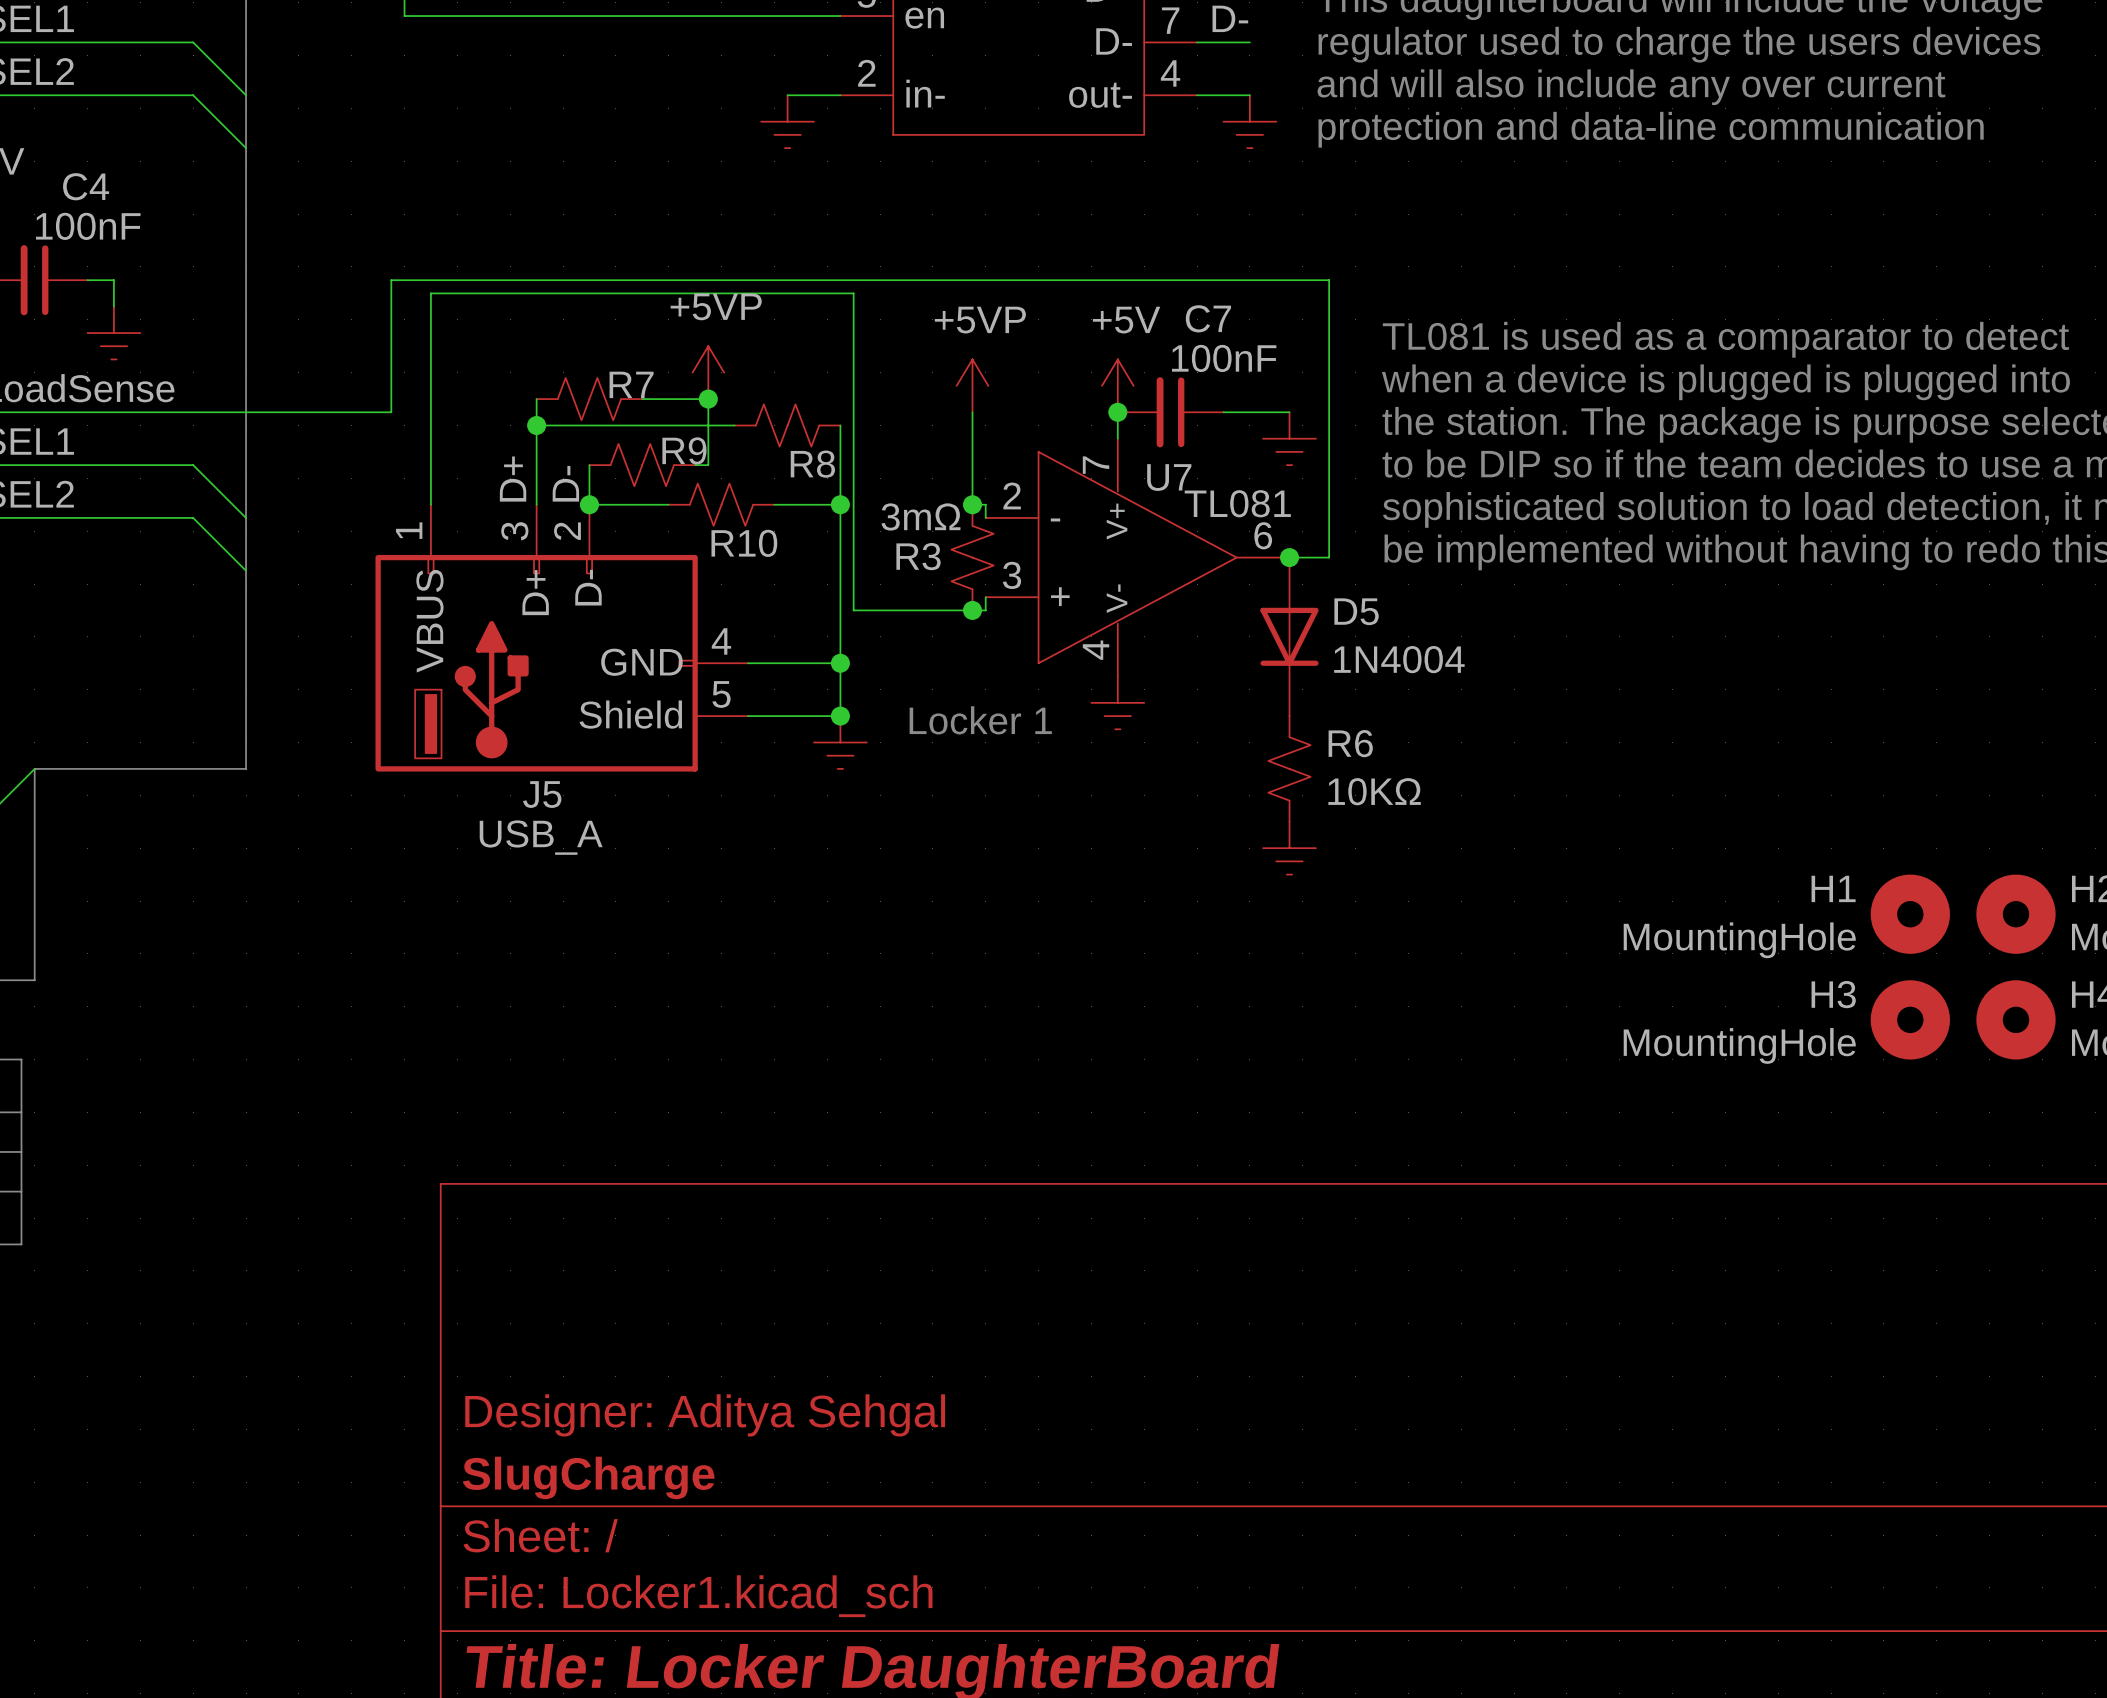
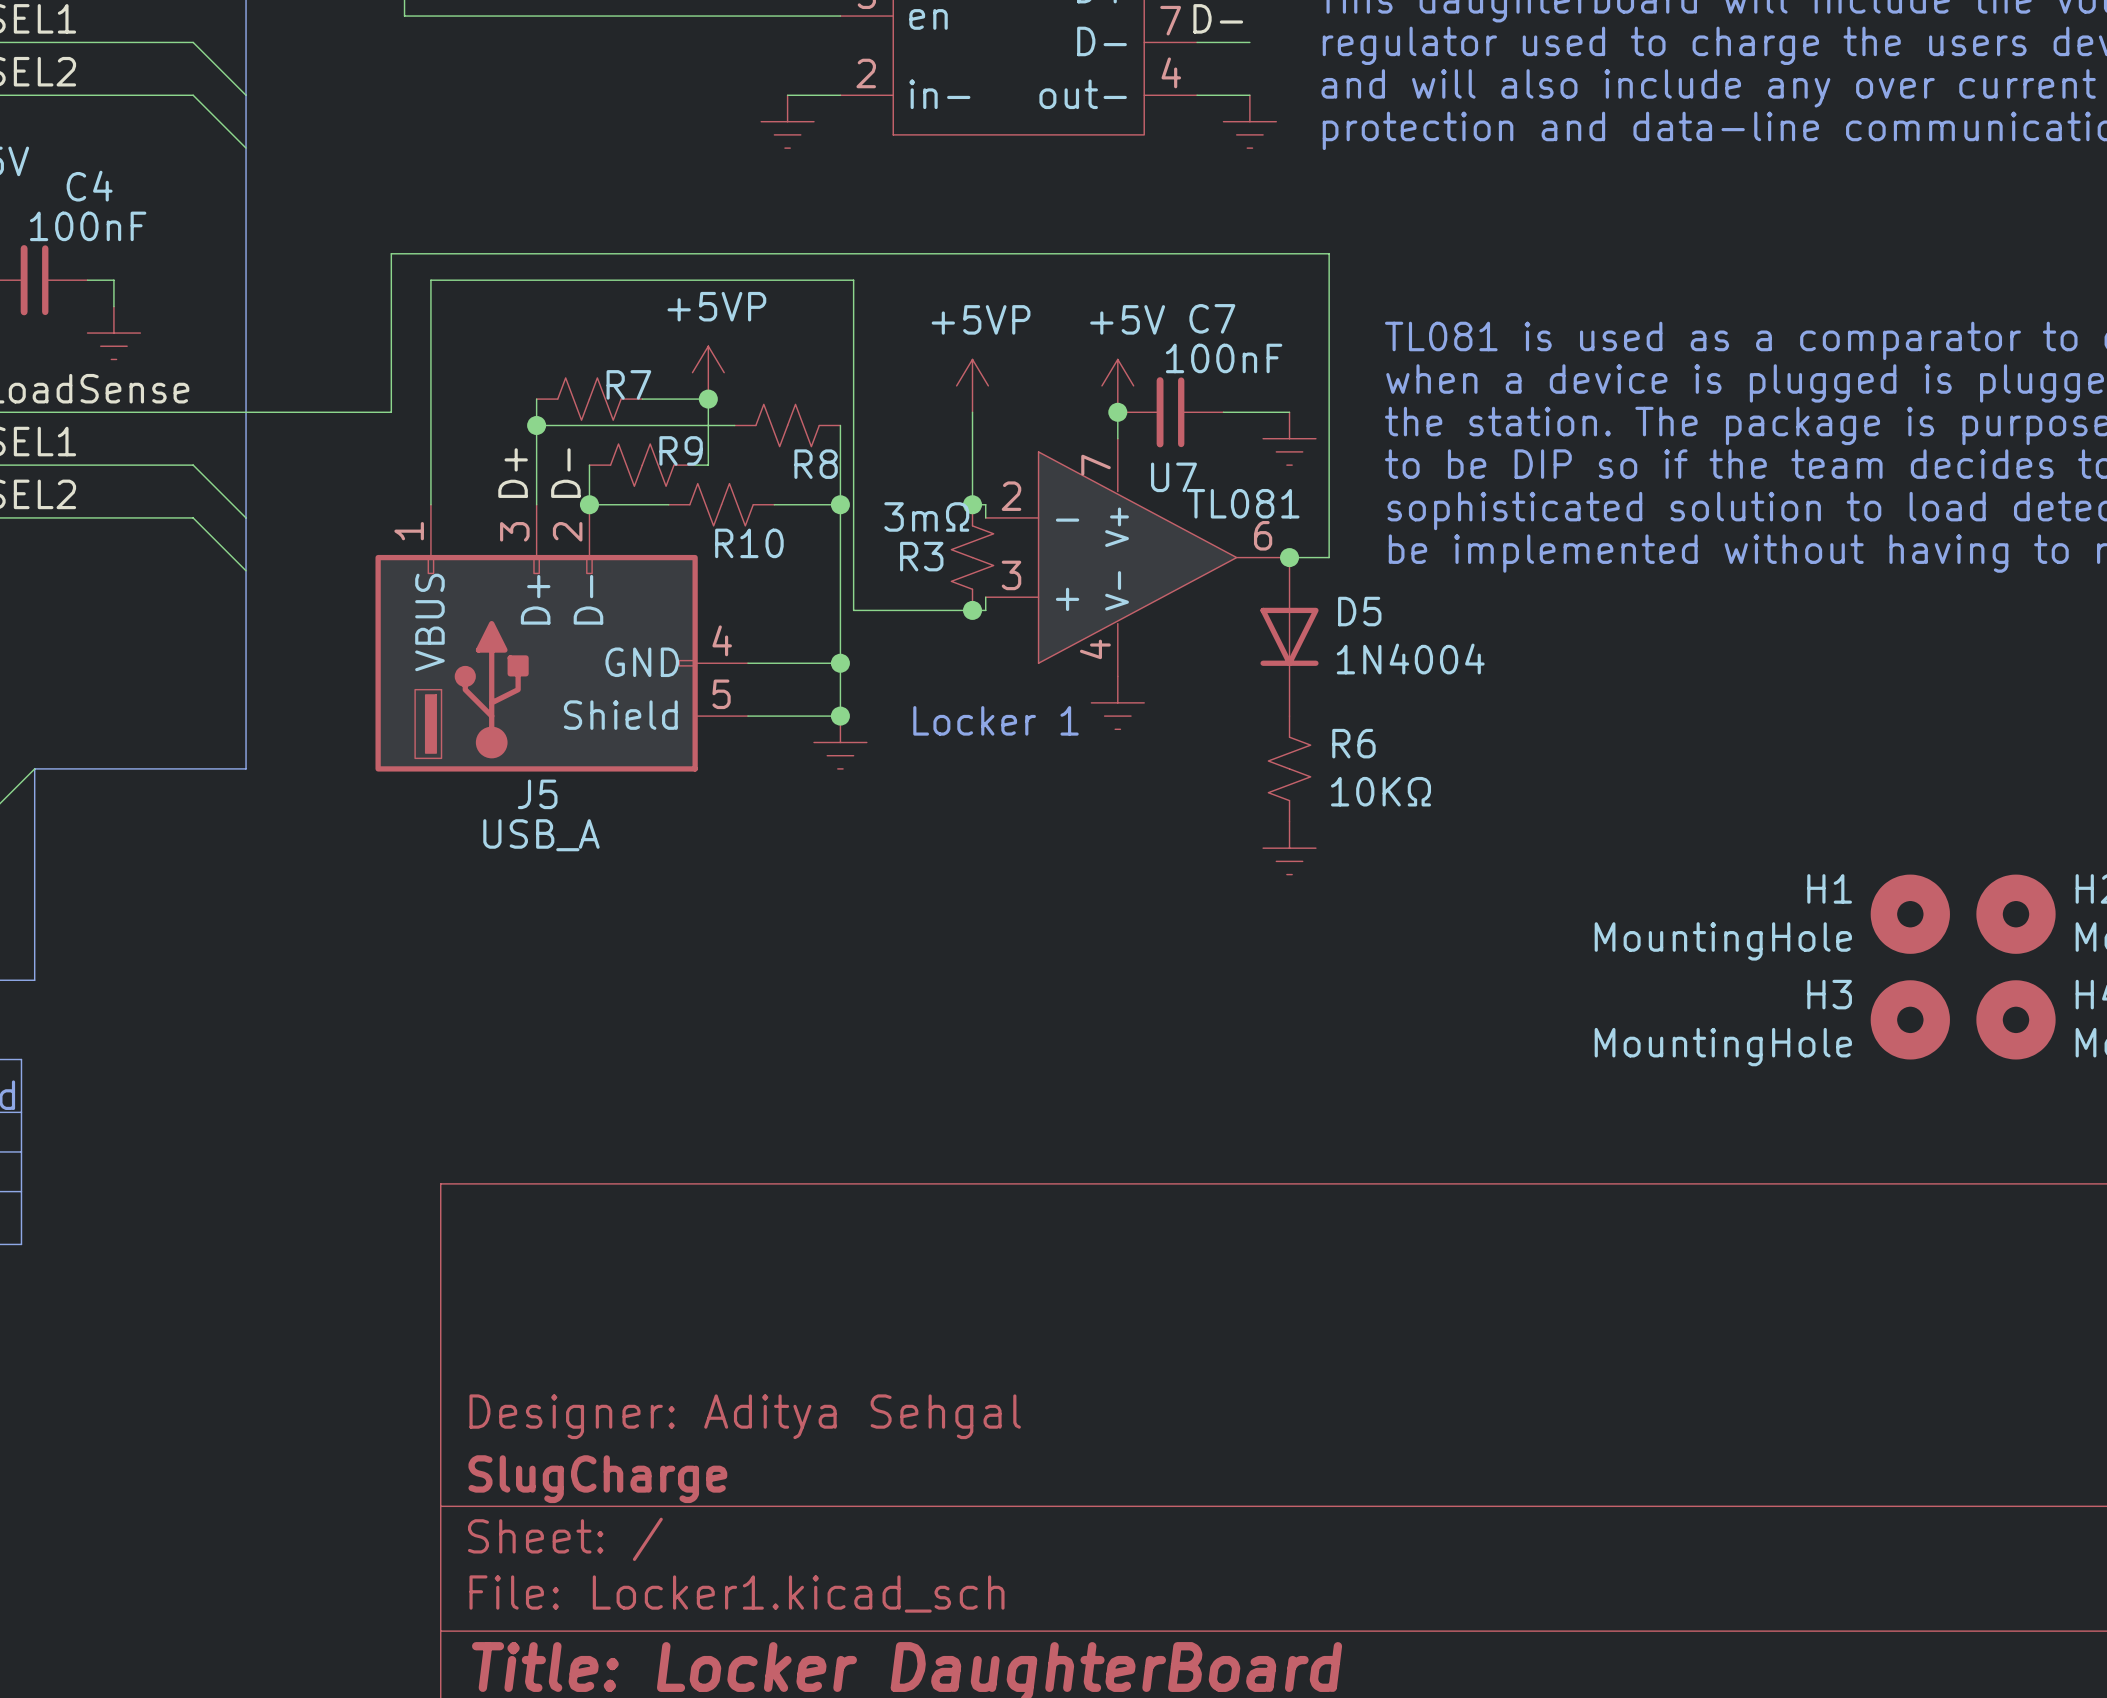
wire: (391, 280) (430, 280) -> (430, 293) (430, 280)
wire: (853, 280) (1329, 280) -> (391, 280) (391, 253) (1329, 253) (1329, 280)
wire: (430, 293) (853, 293) -> (853, 280) (853, 293)

